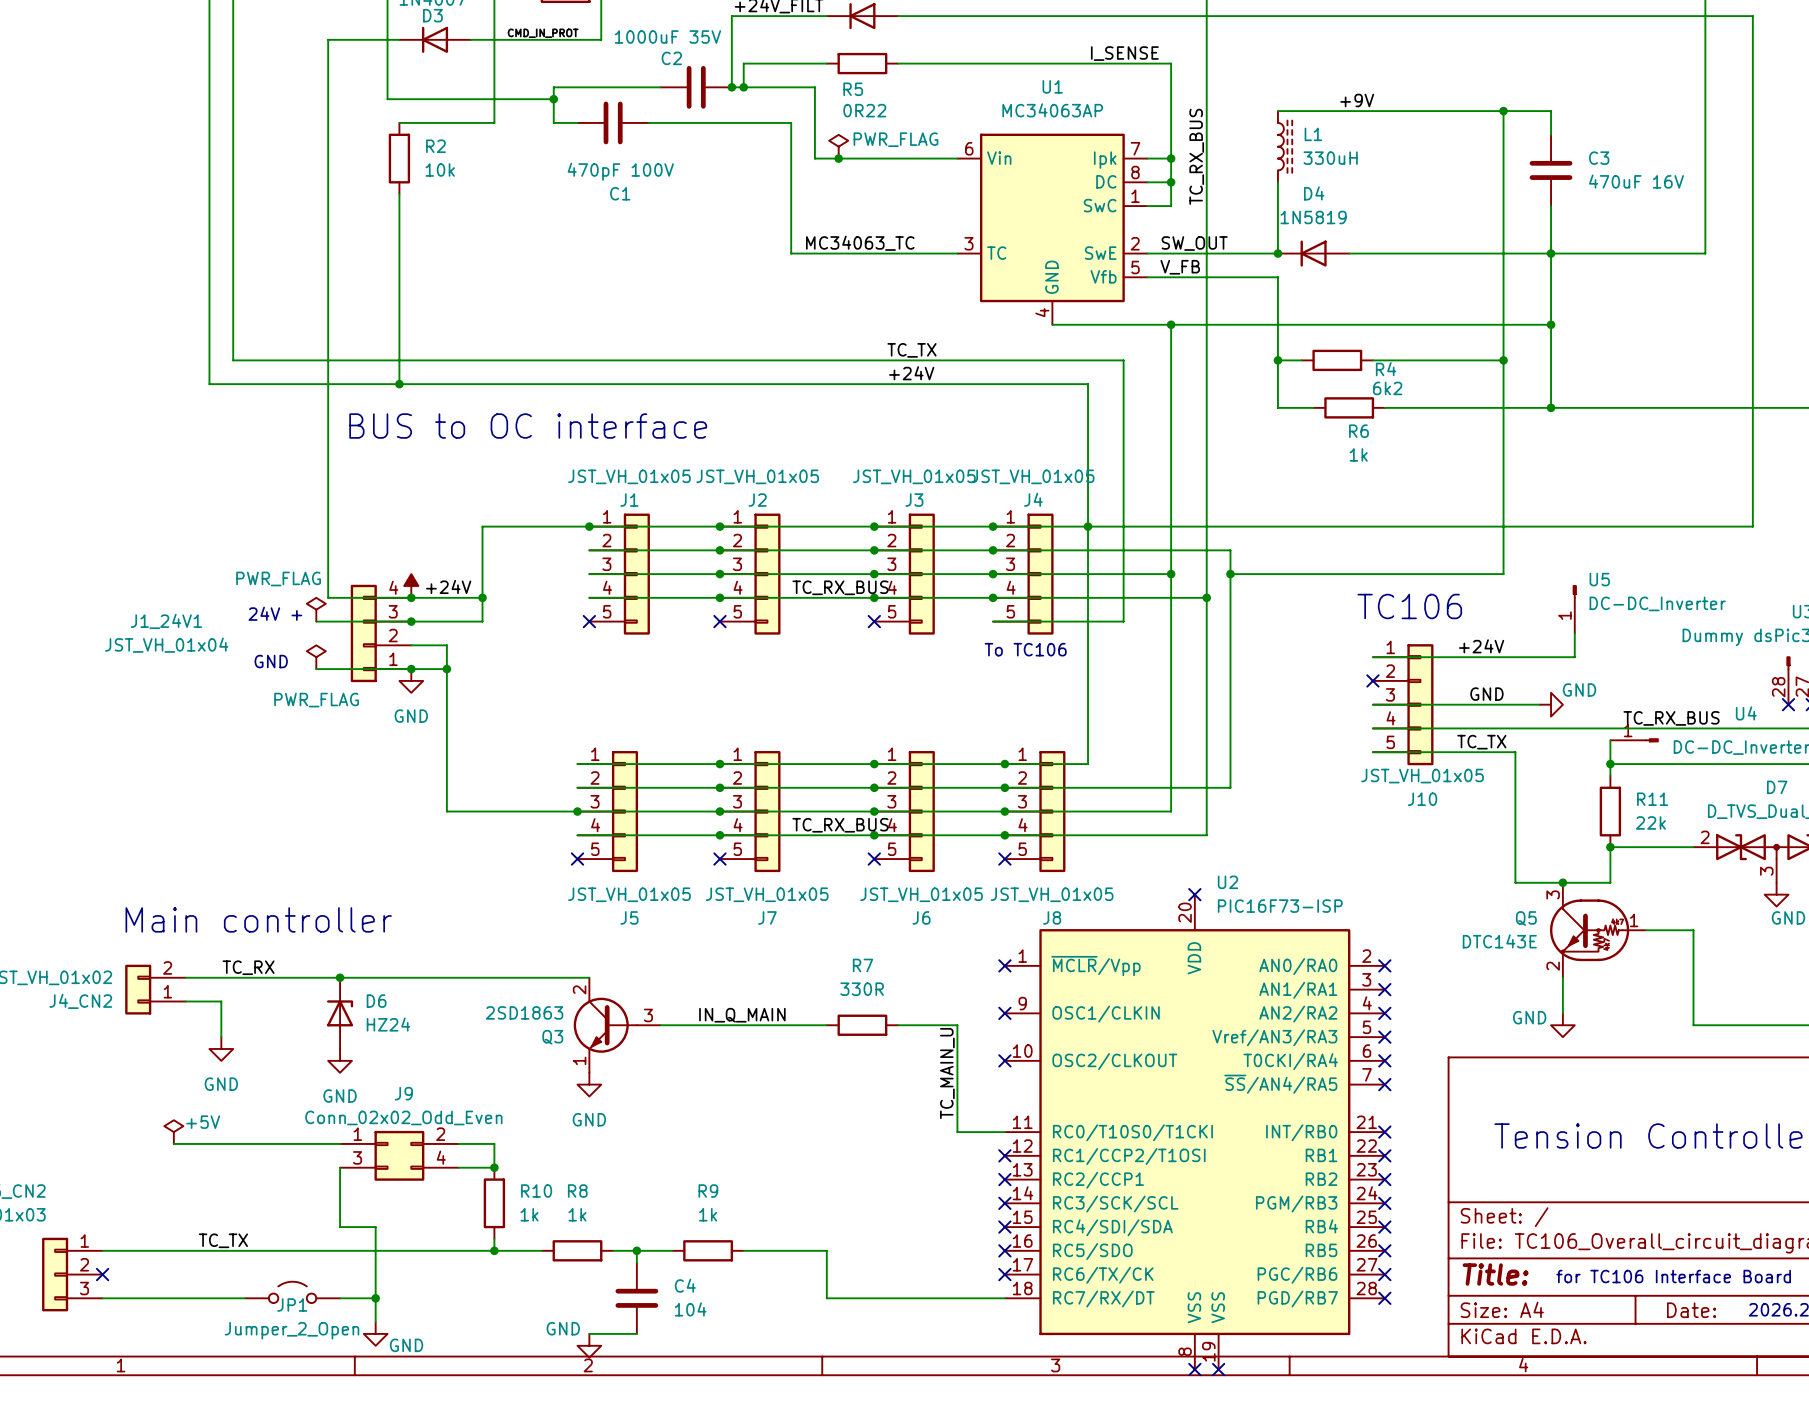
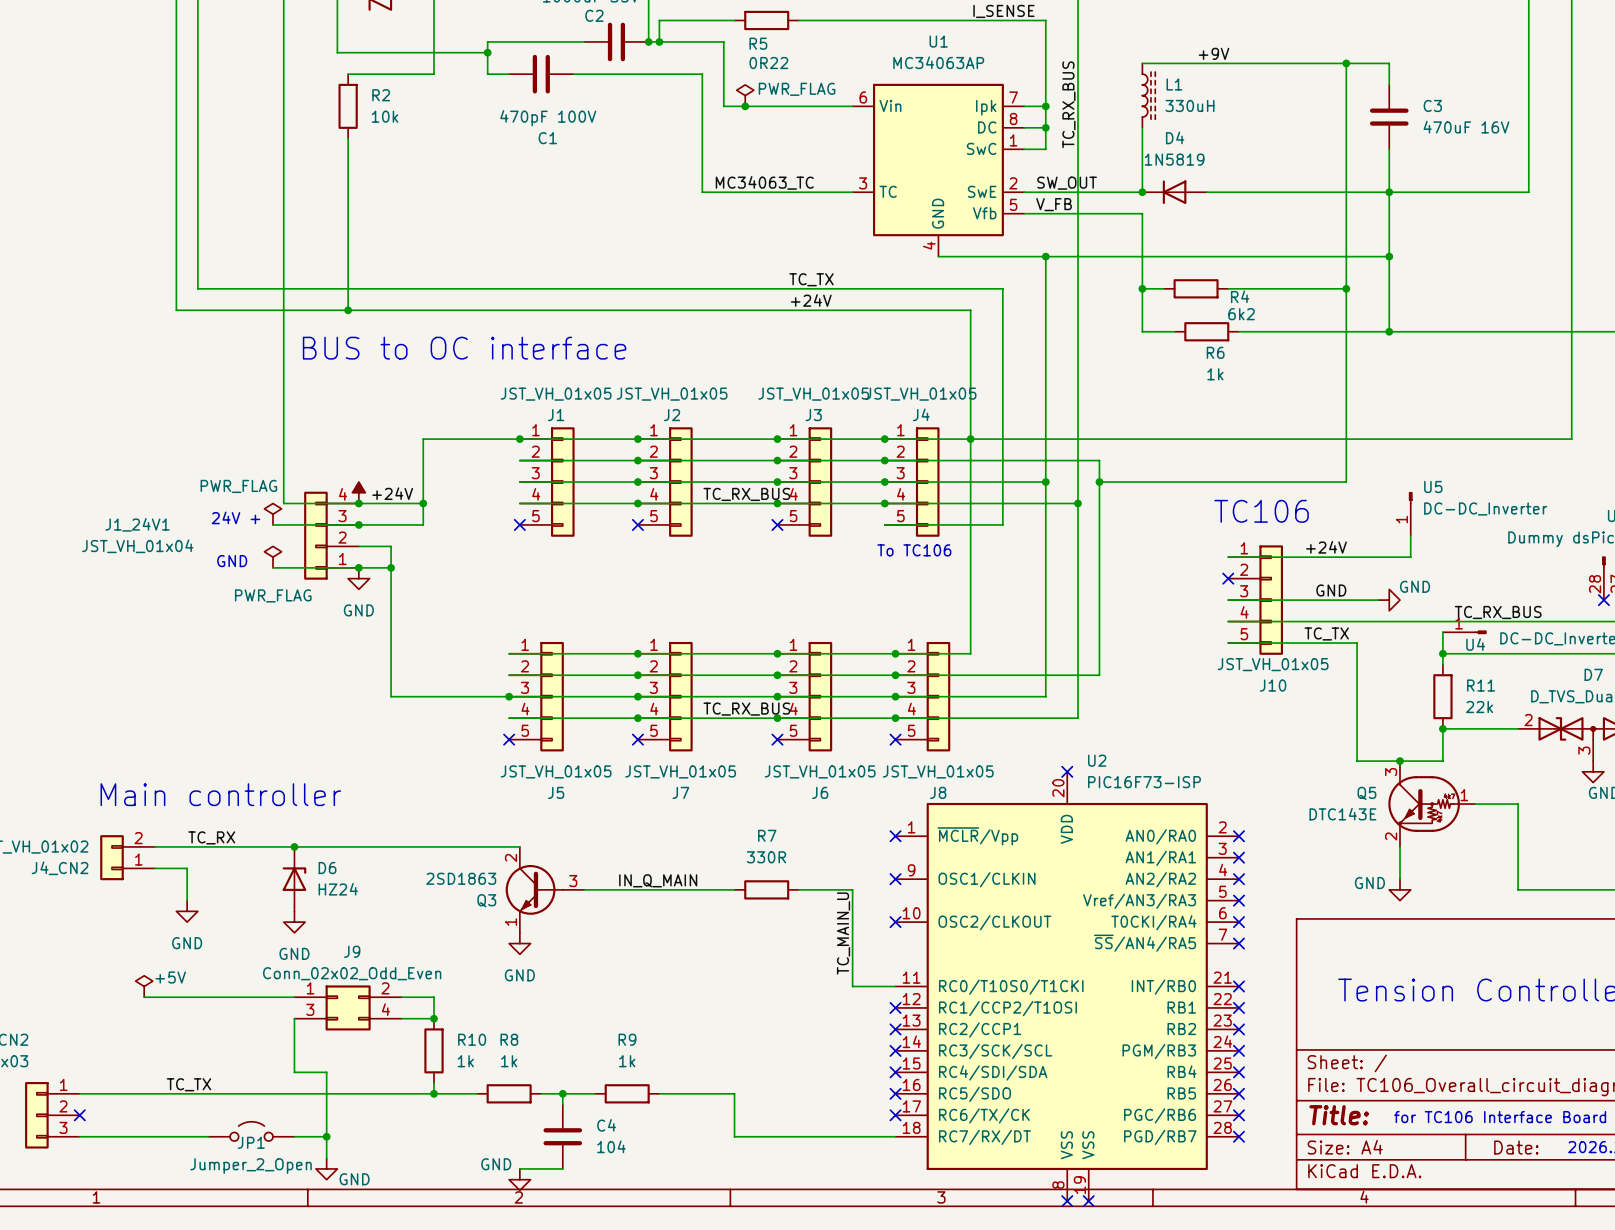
U4 name position: U4 (1746, 713) -> U4 (1475, 644)

